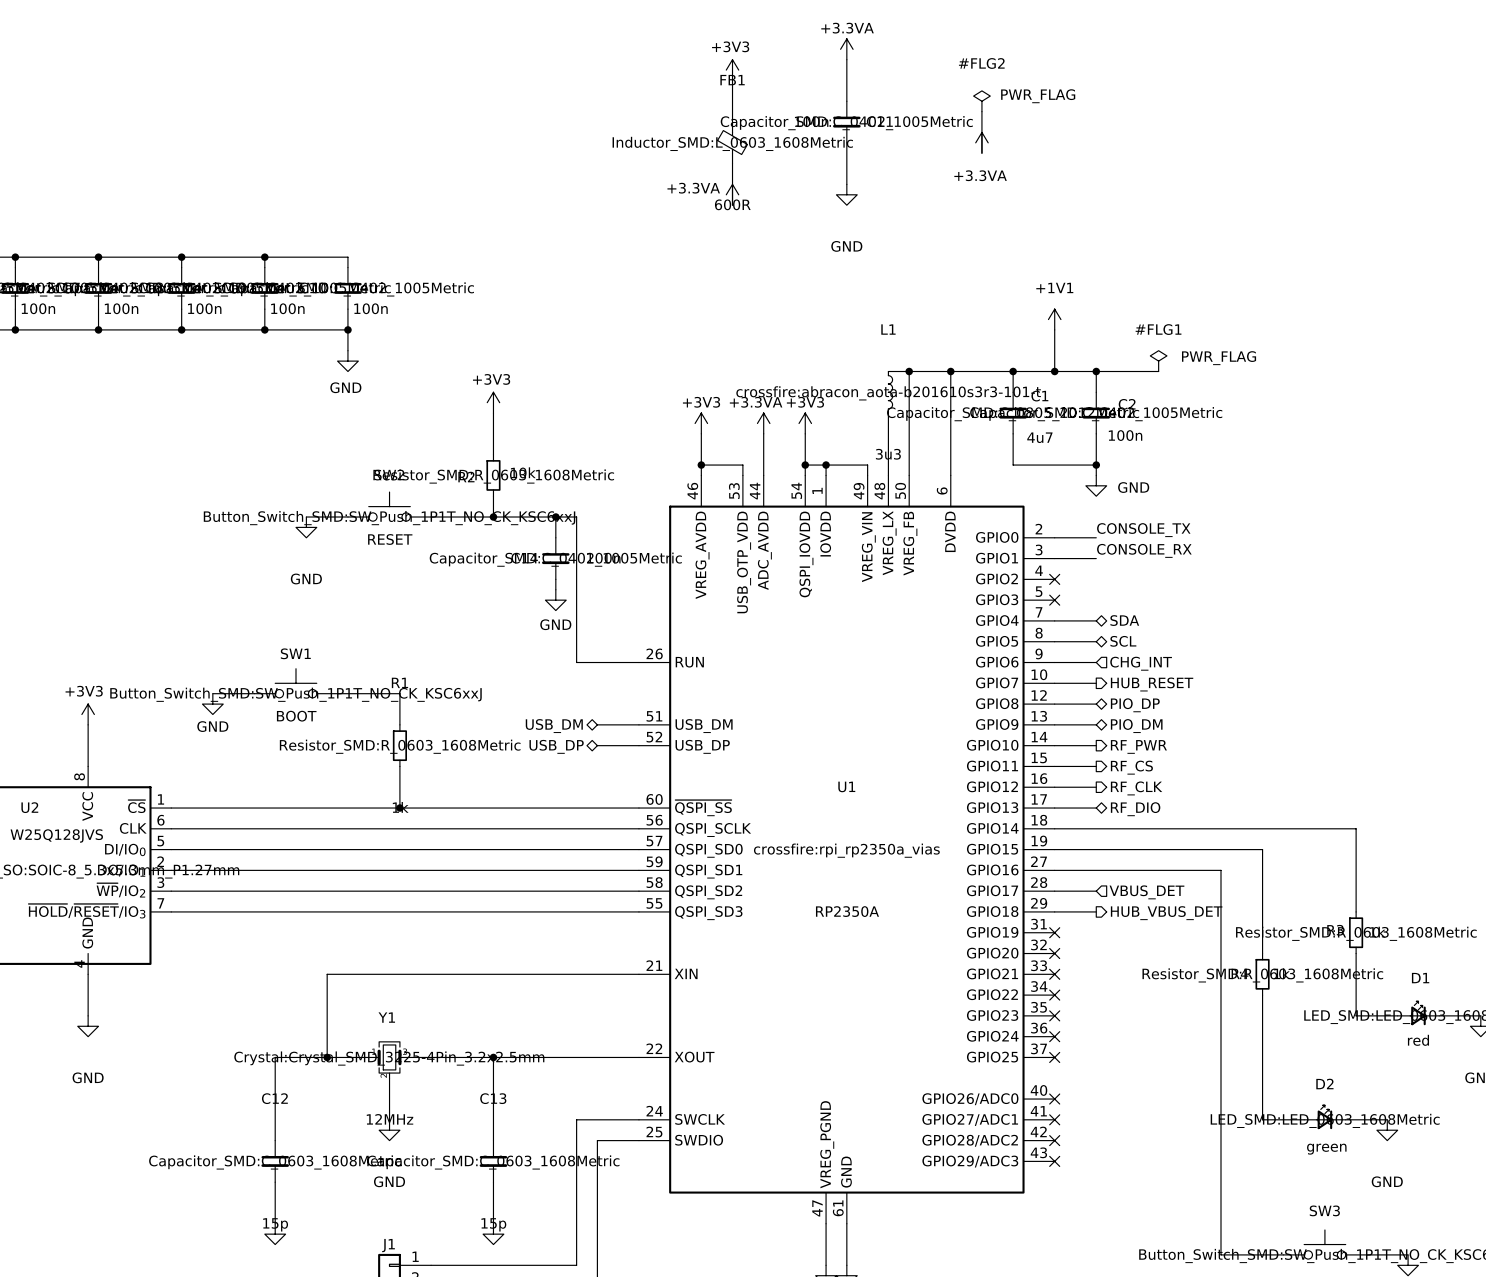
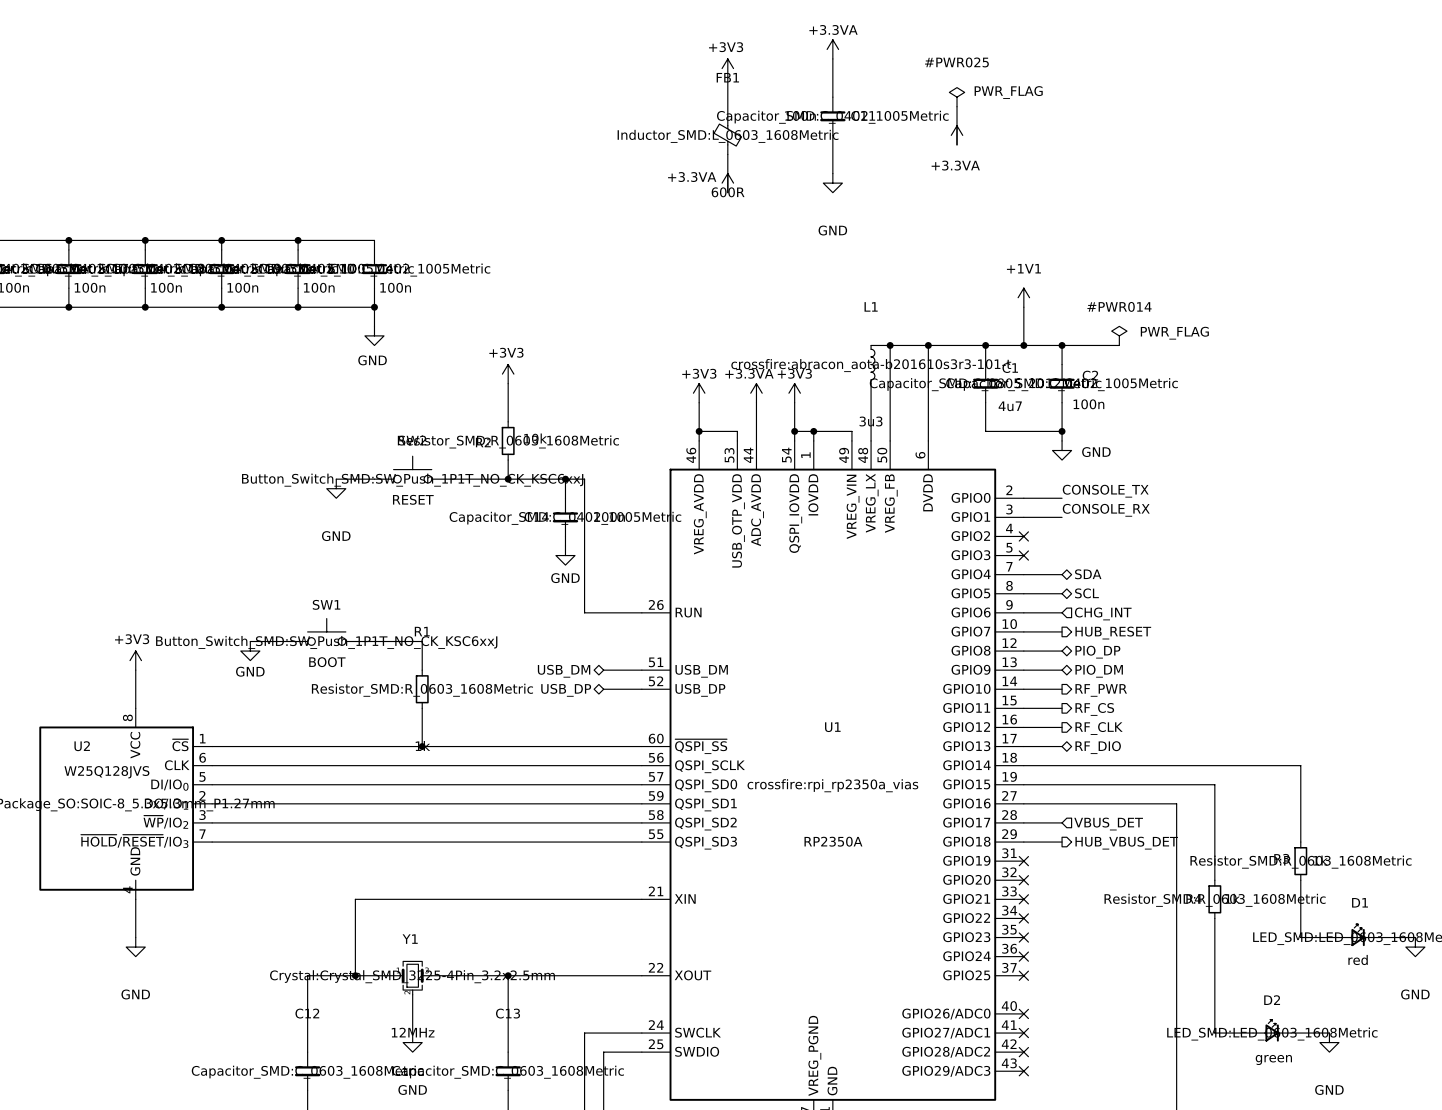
#FLG2 name: #FLG2 (981, 63) -> #PWR025 (956, 62)
#FLG1 name: #FLG1 (1158, 329) -> #PWR014 (1119, 306)

